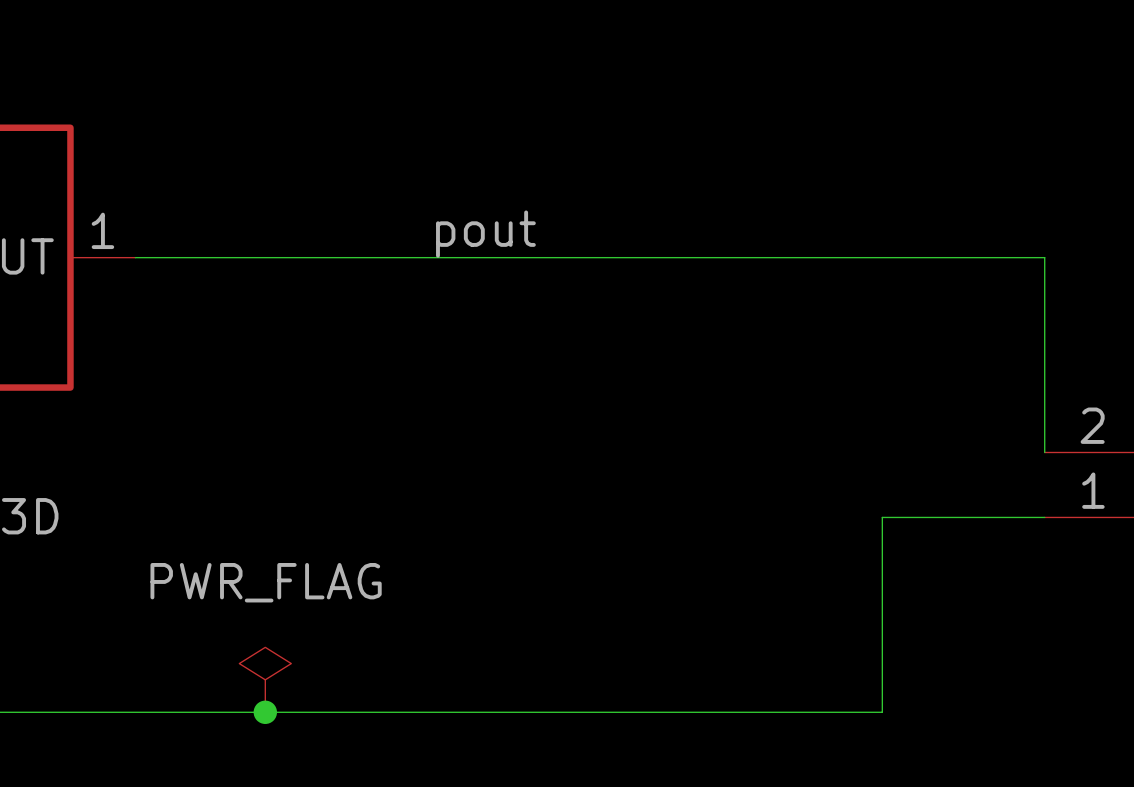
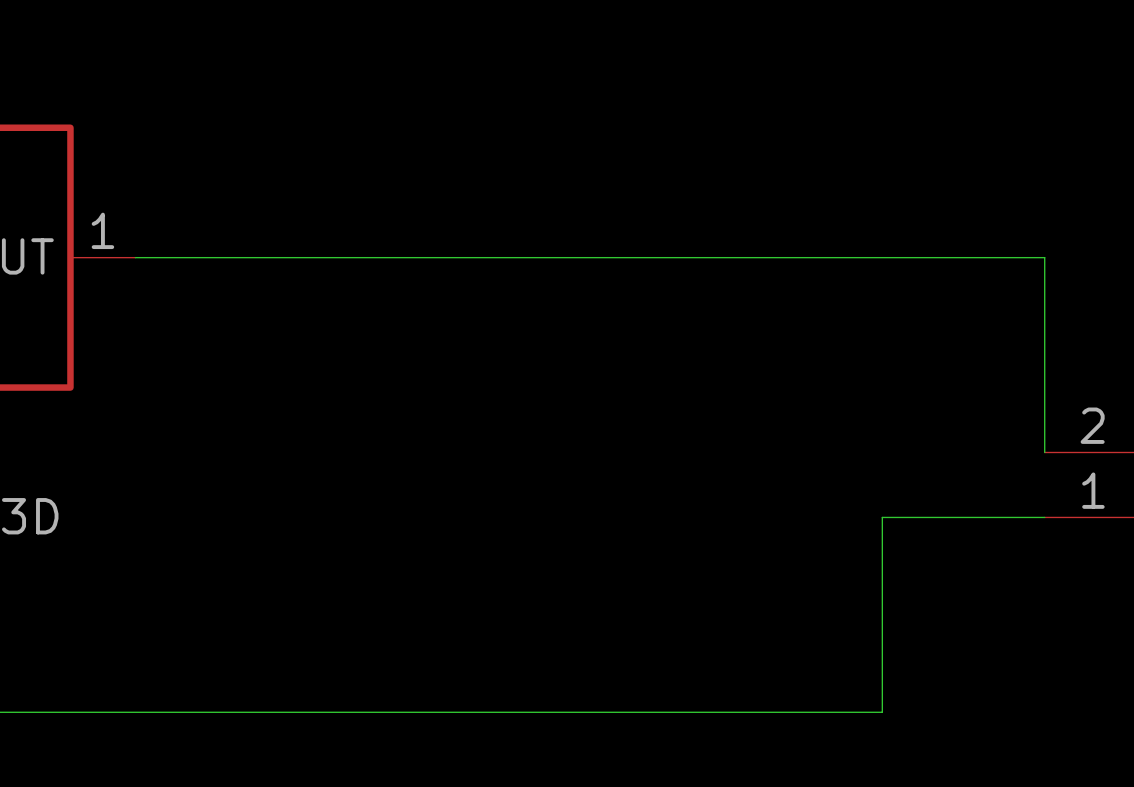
label: pout (485, 234) -> none
power symbol: PWR_FLAG (265, 679) -> none
junction: (265, 712) -> none

